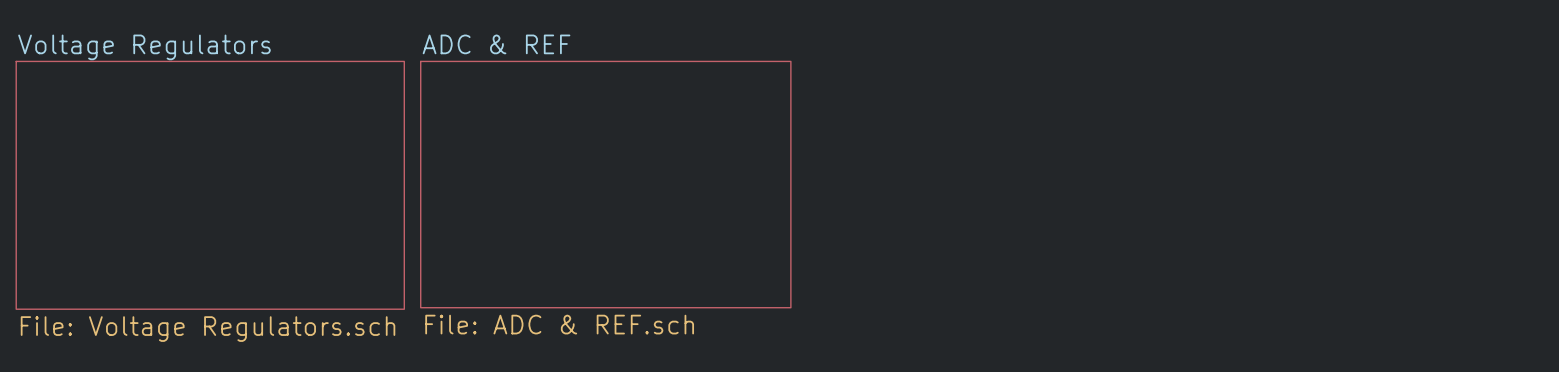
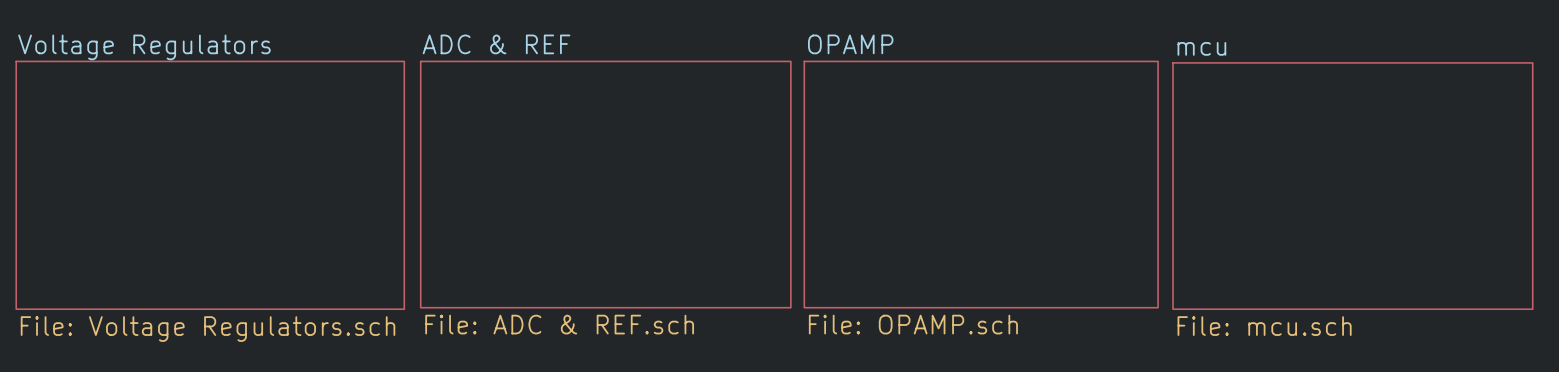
sheet OPAMP: none -> File: OPAMP.sch (981, 184)
sheet mcu: none -> File: mcu.sch (1352, 186)

